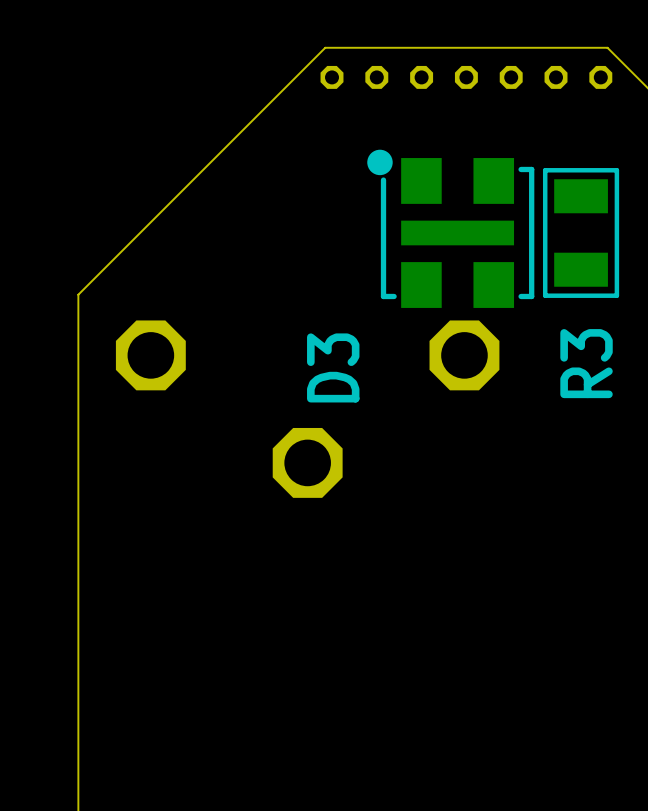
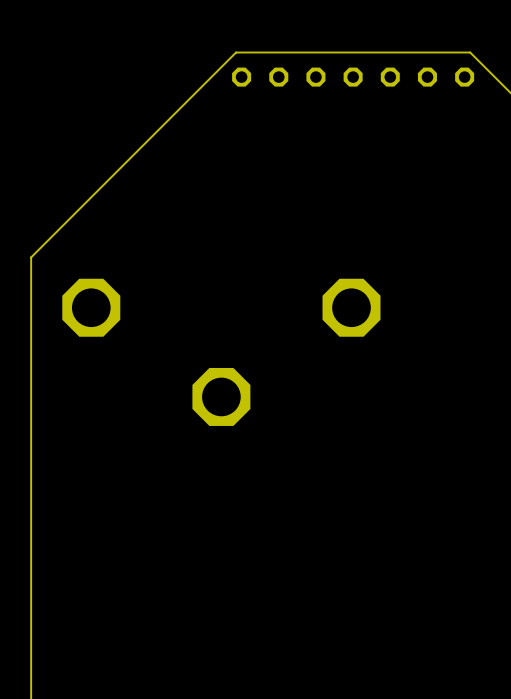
D3: (450, 228) -> none
R3: (581, 232) -> none

